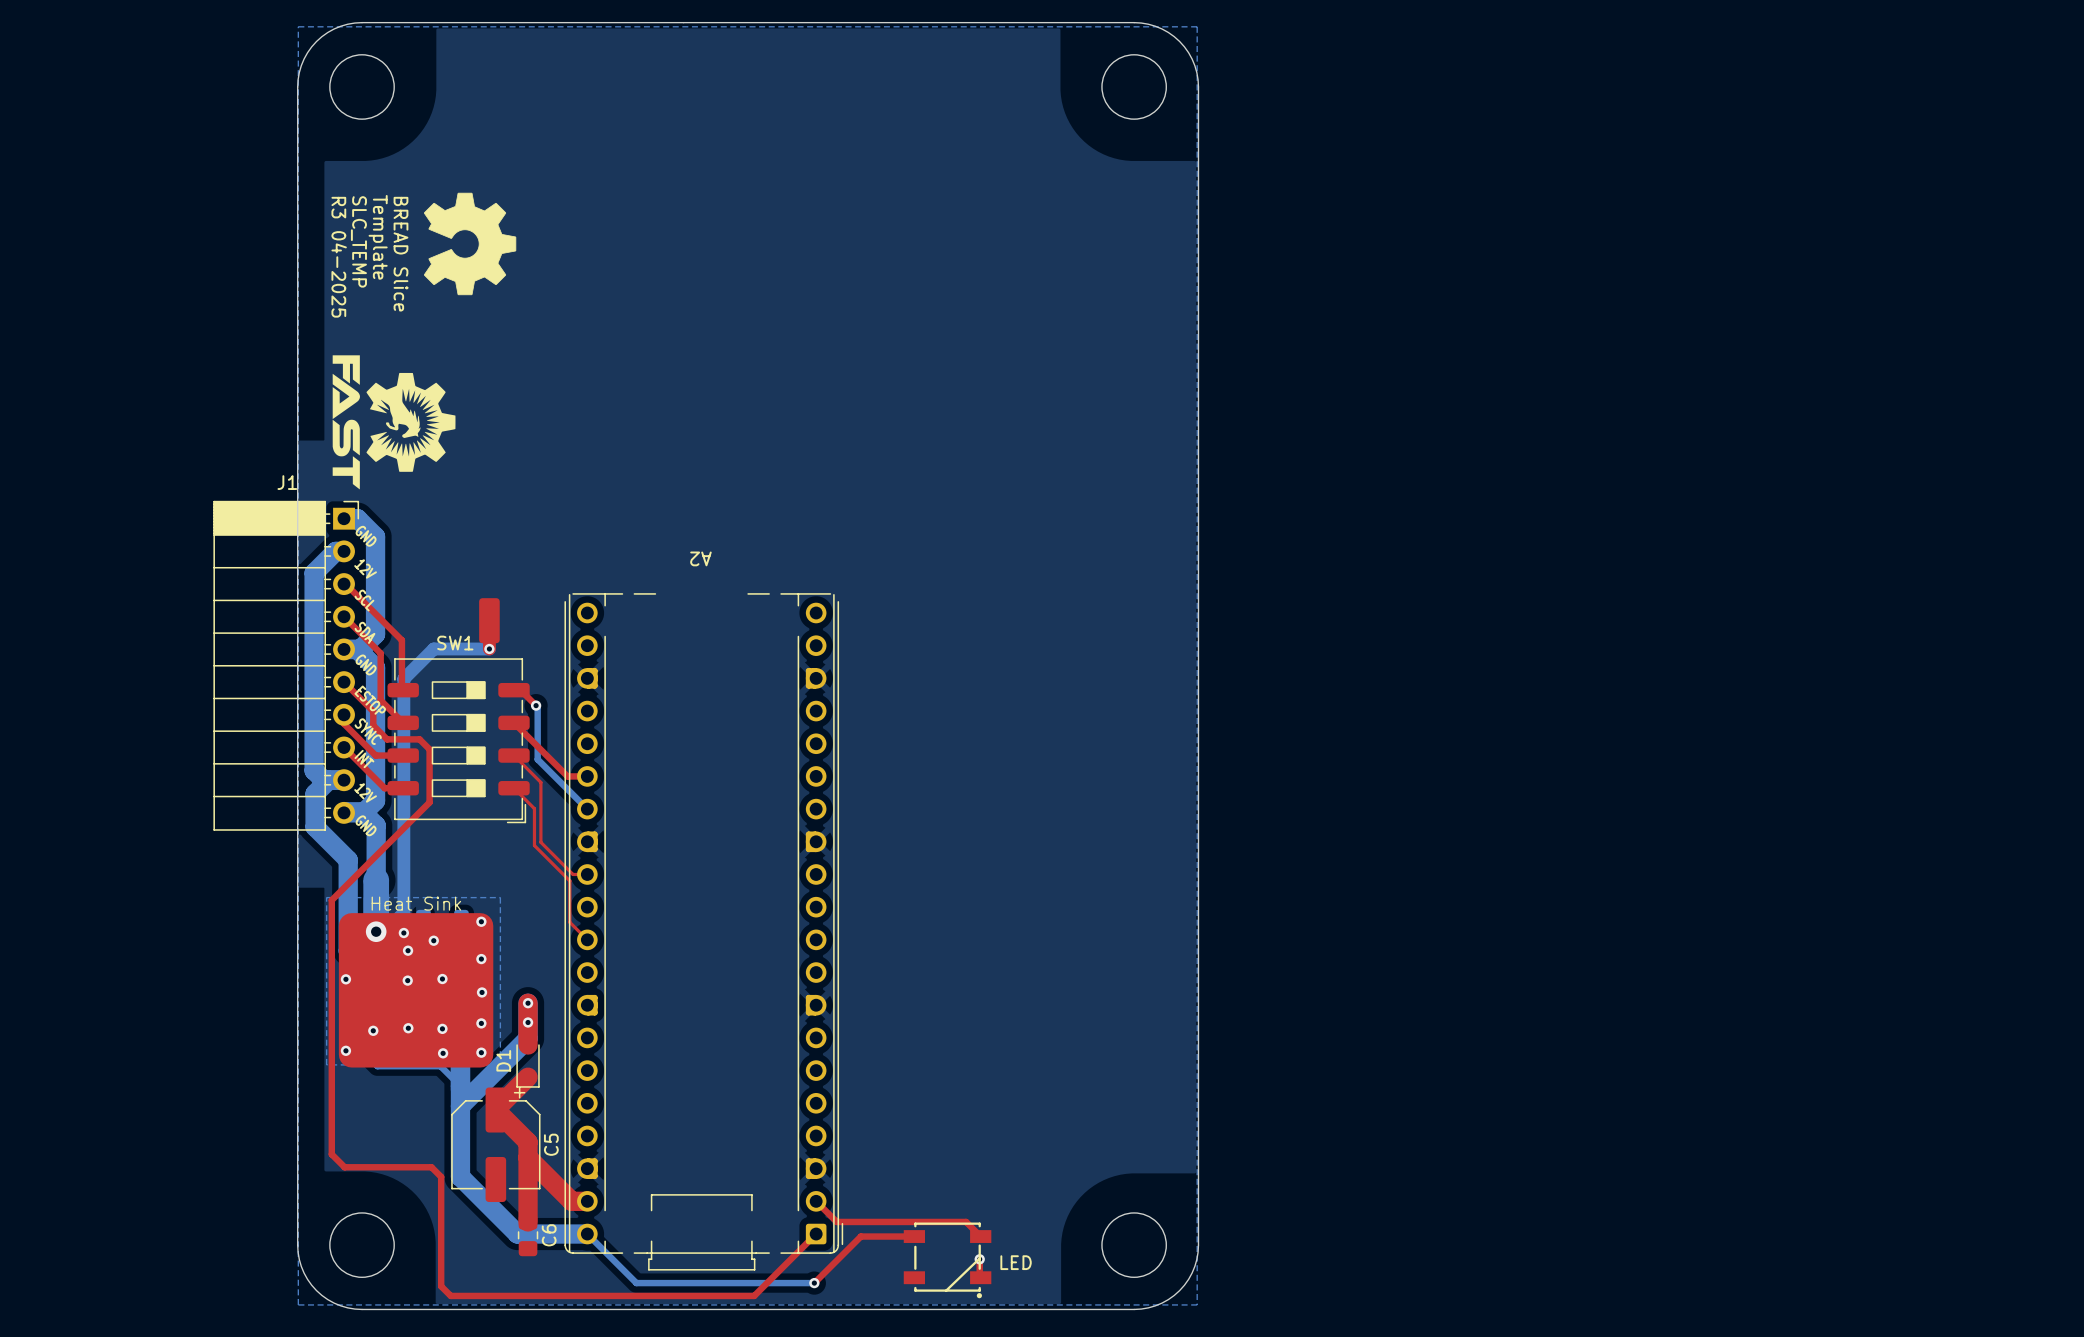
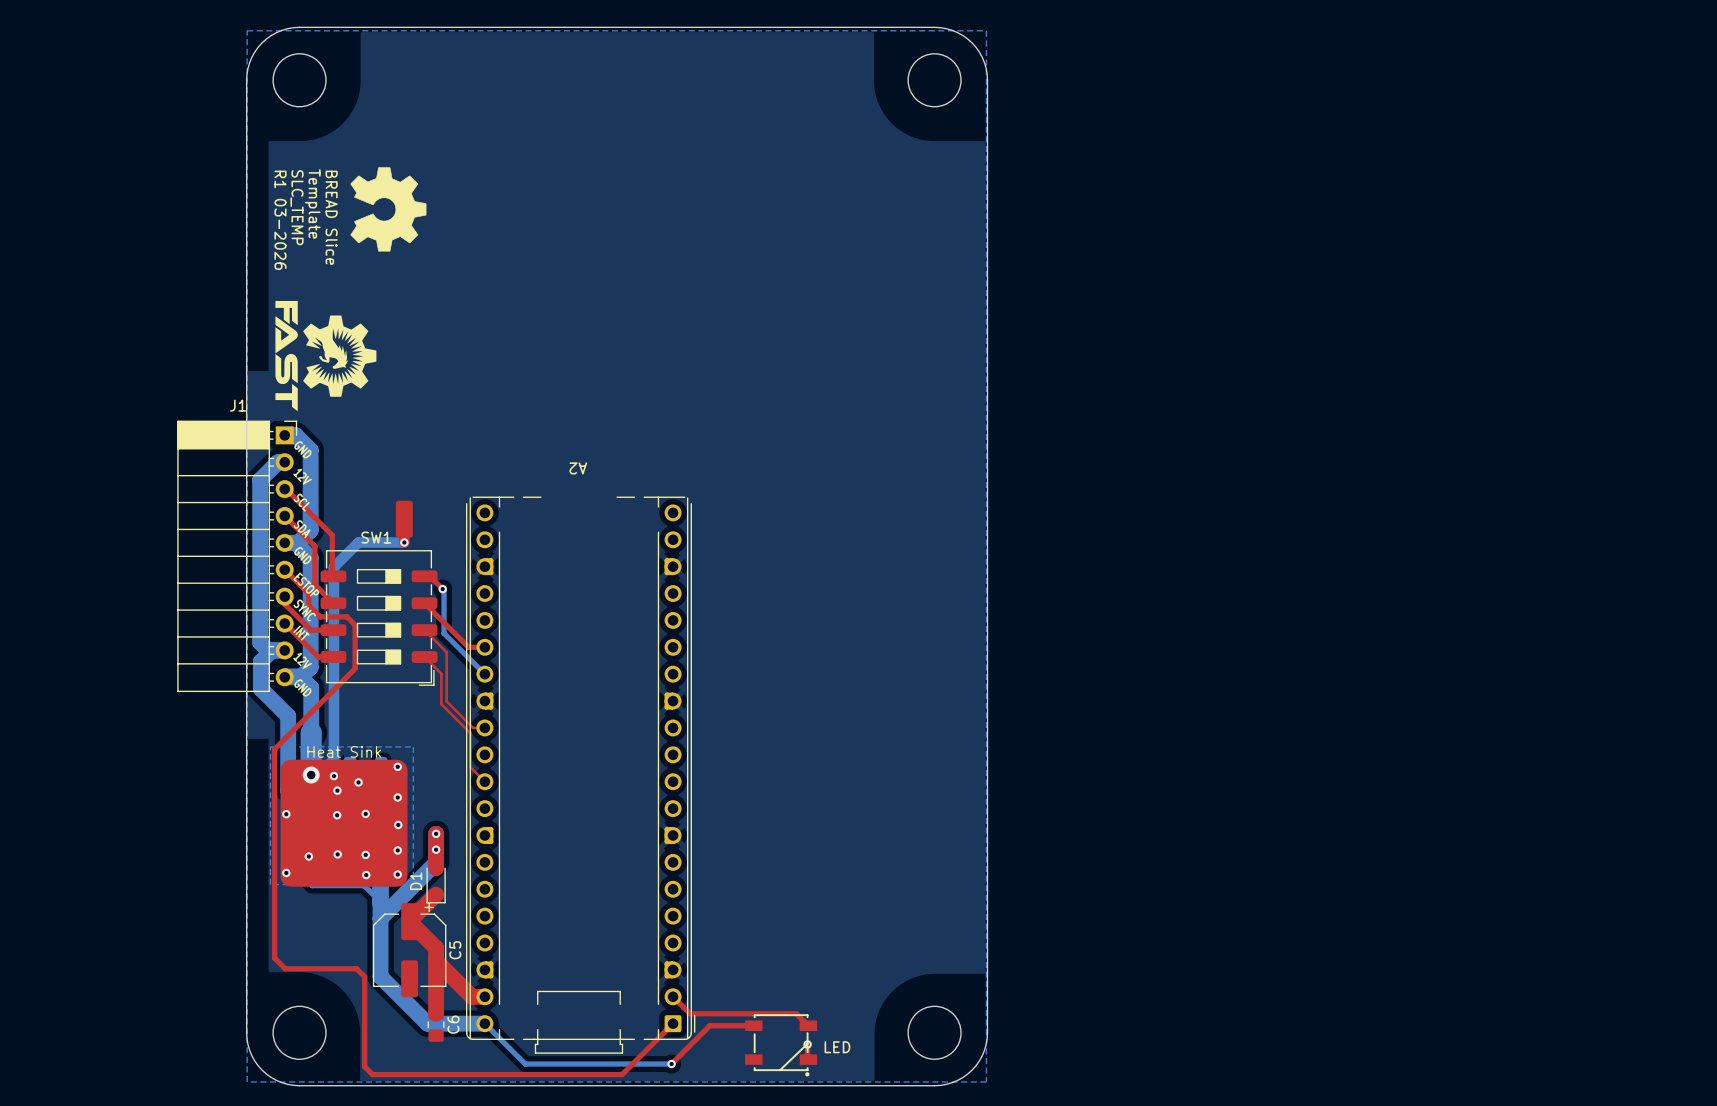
text: R3 04-2025 (339, 257) -> R1 03-2026 (280, 220)

